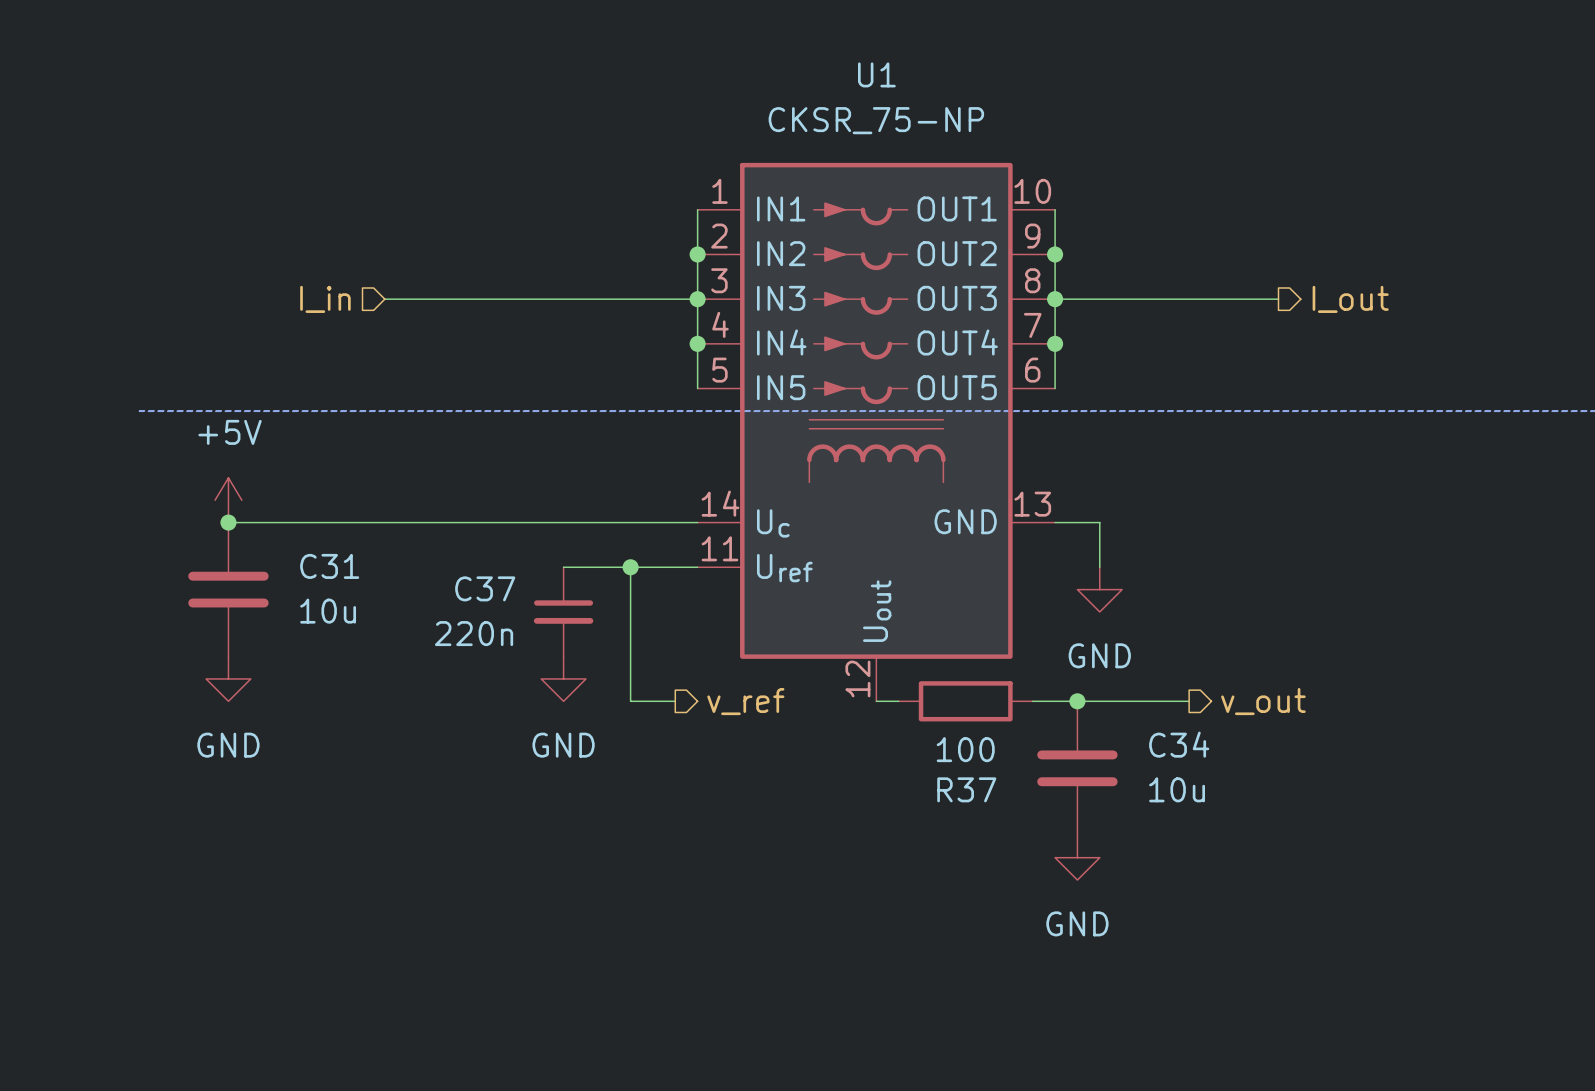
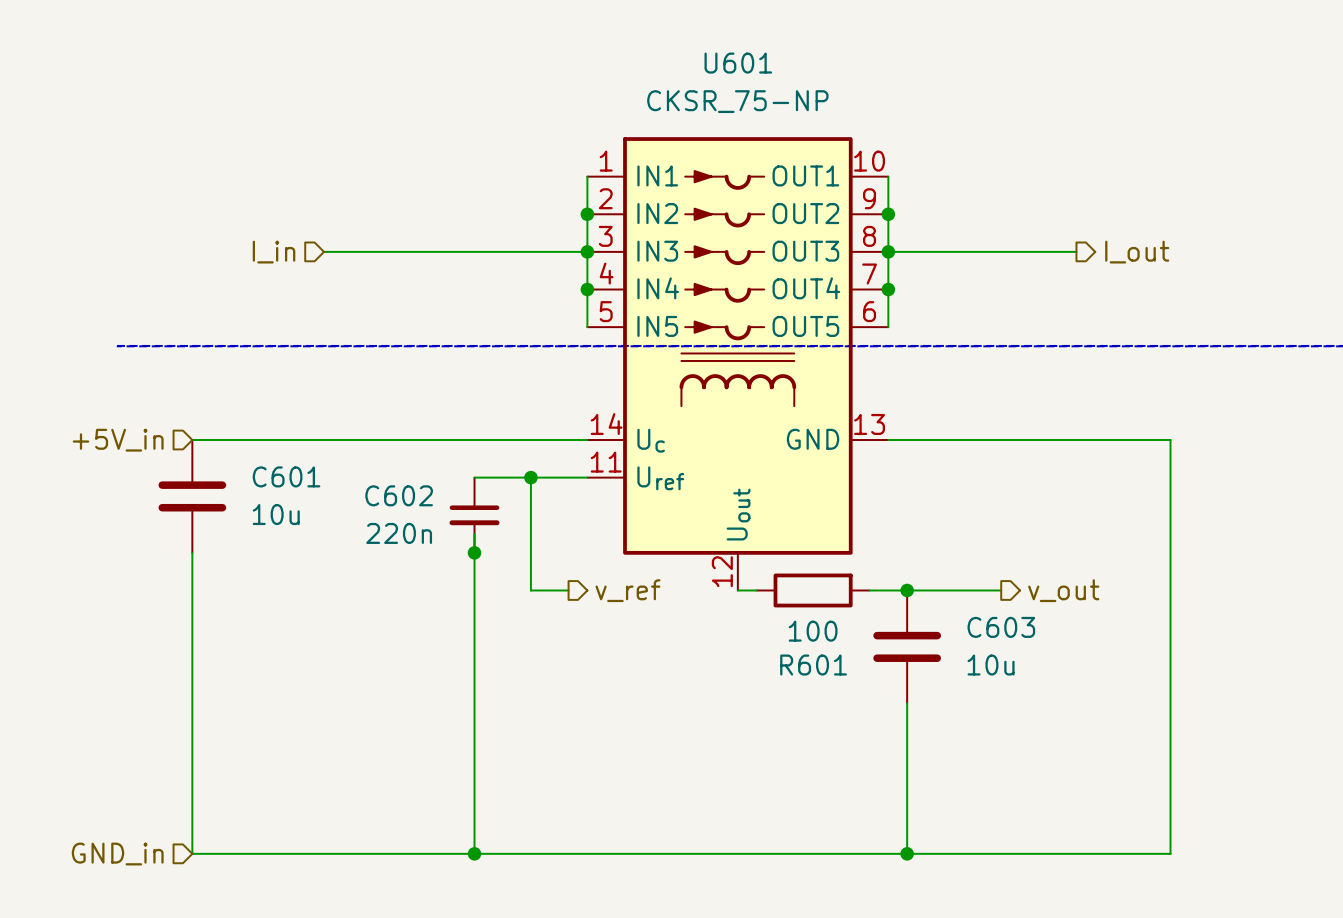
U1 name: U1 (876, 74) -> U601 (738, 63)
power symbol: +5V (228, 500) -> none
hierarchical label: none -> +5V_in (118, 440)
junction: (228, 522) -> none
wire: (1099, 522) (1099, 567) -> (925, 439) (1170, 439) (1170, 853) (192, 853) (192, 552)
C31 name: C31 (329, 566) -> C601 (286, 476)
C37 name: C37 (485, 588) -> C602 (399, 495)
power symbol: GND (1099, 589) -> none
wire: none -> (474, 534) (474, 853)
junction: none -> (474, 552)
power symbol: GND (228, 678) -> none
power symbol: GND (563, 678) -> none
C34 name: C34 (1179, 744) -> C603 (1001, 627)
R37 name: R37 (966, 789) -> R601 (813, 665)
wire: none -> (907, 703) (907, 853)
power symbol: GND (1077, 857) -> none
hierarchical label: none -> GND_in (117, 854)
junction: none -> (474, 853)
junction: none -> (907, 853)

